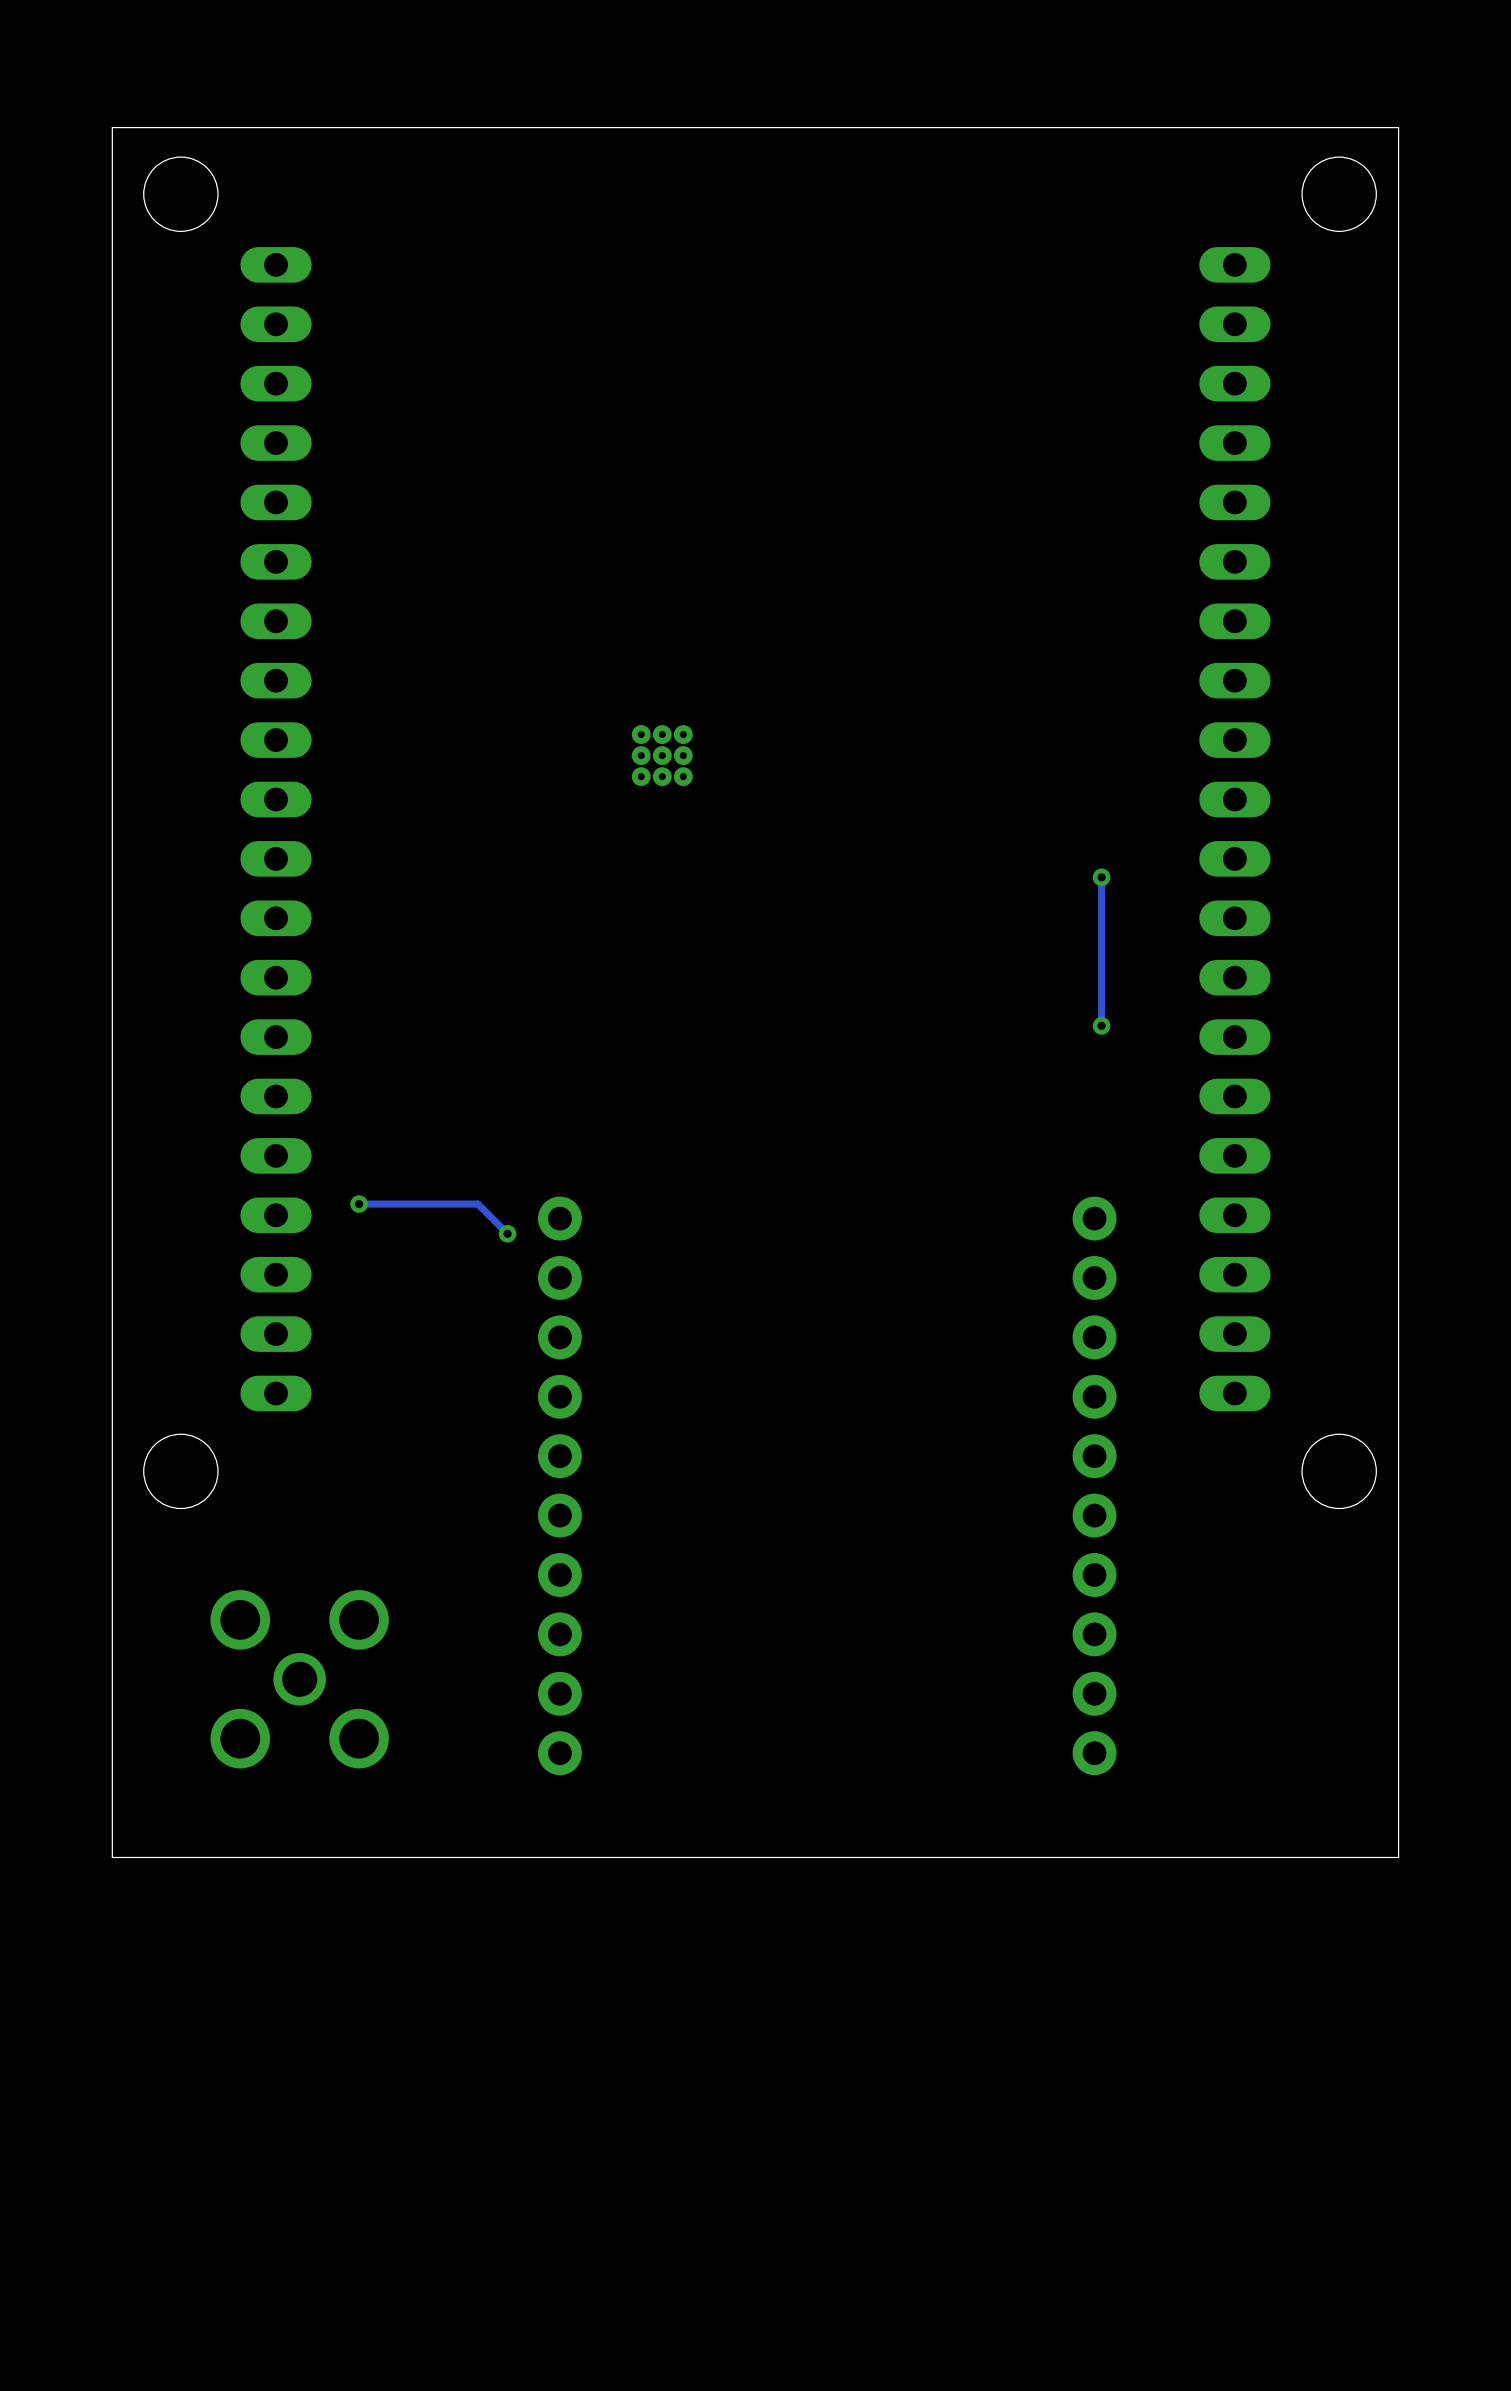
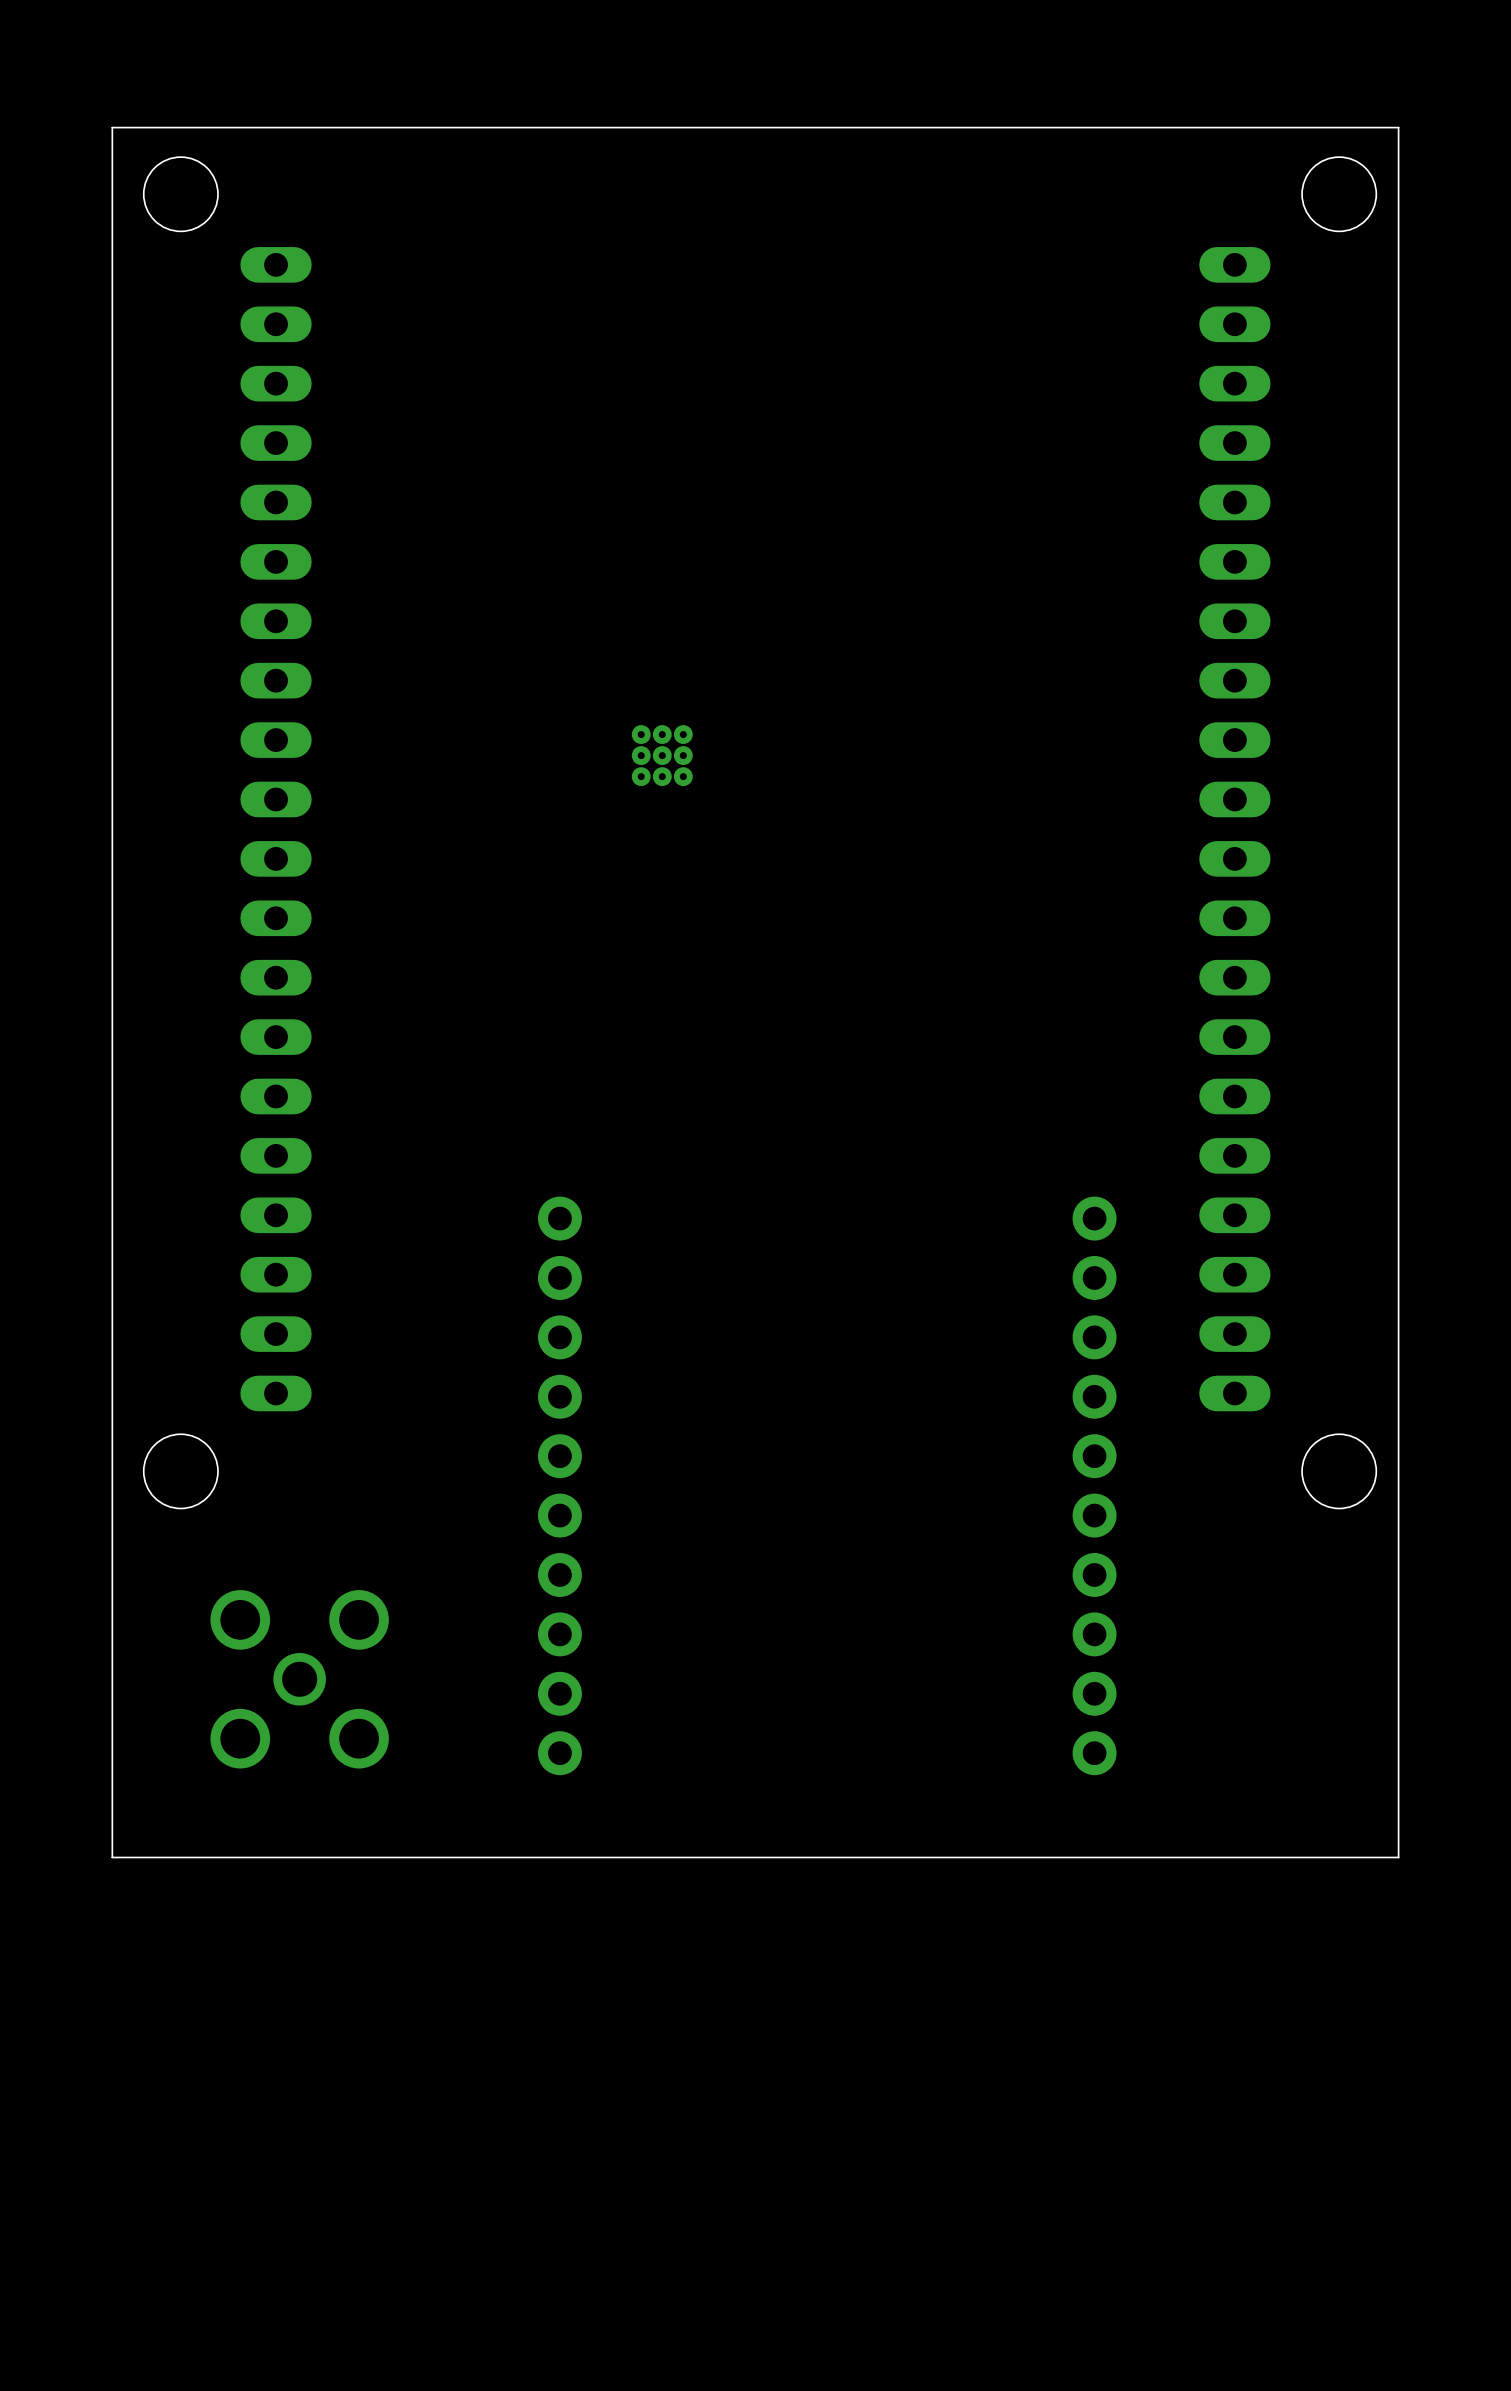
track: (1101, 877) (1101, 1025) -> none
via: (1101, 877) -> none
via: (1101, 1025) -> none
track: (359, 1204) (477, 1204) (507, 1233) -> none
via: (359, 1204) -> none
via: (507, 1233) -> none

